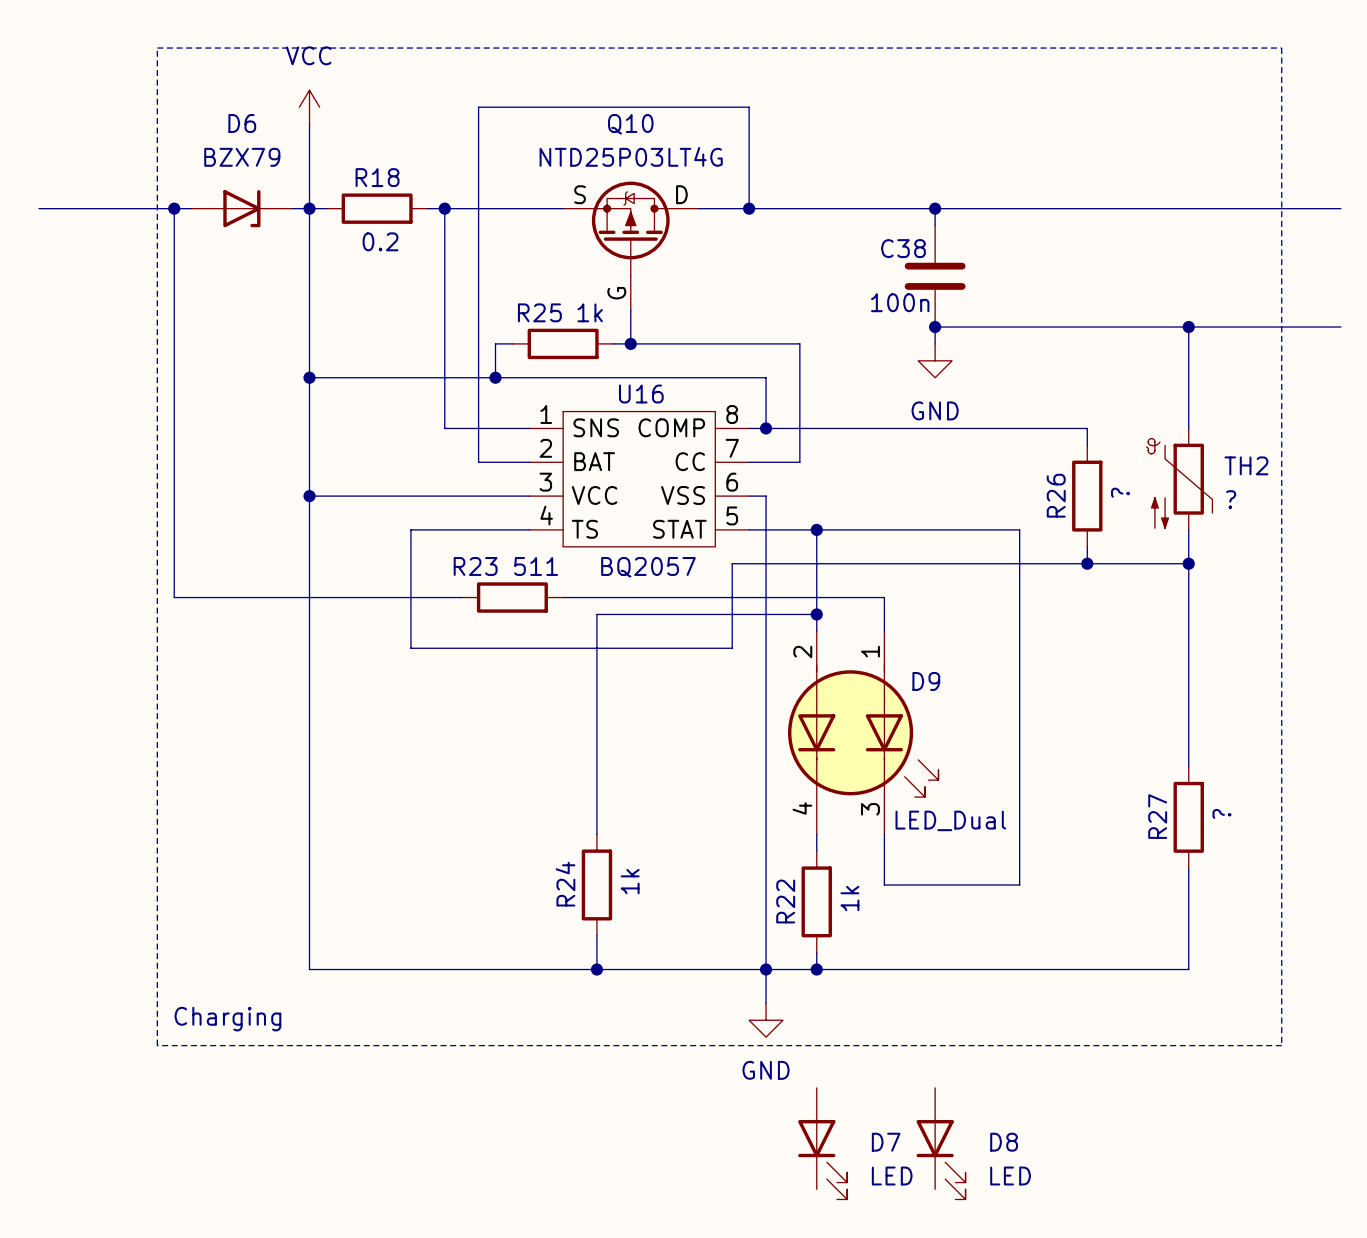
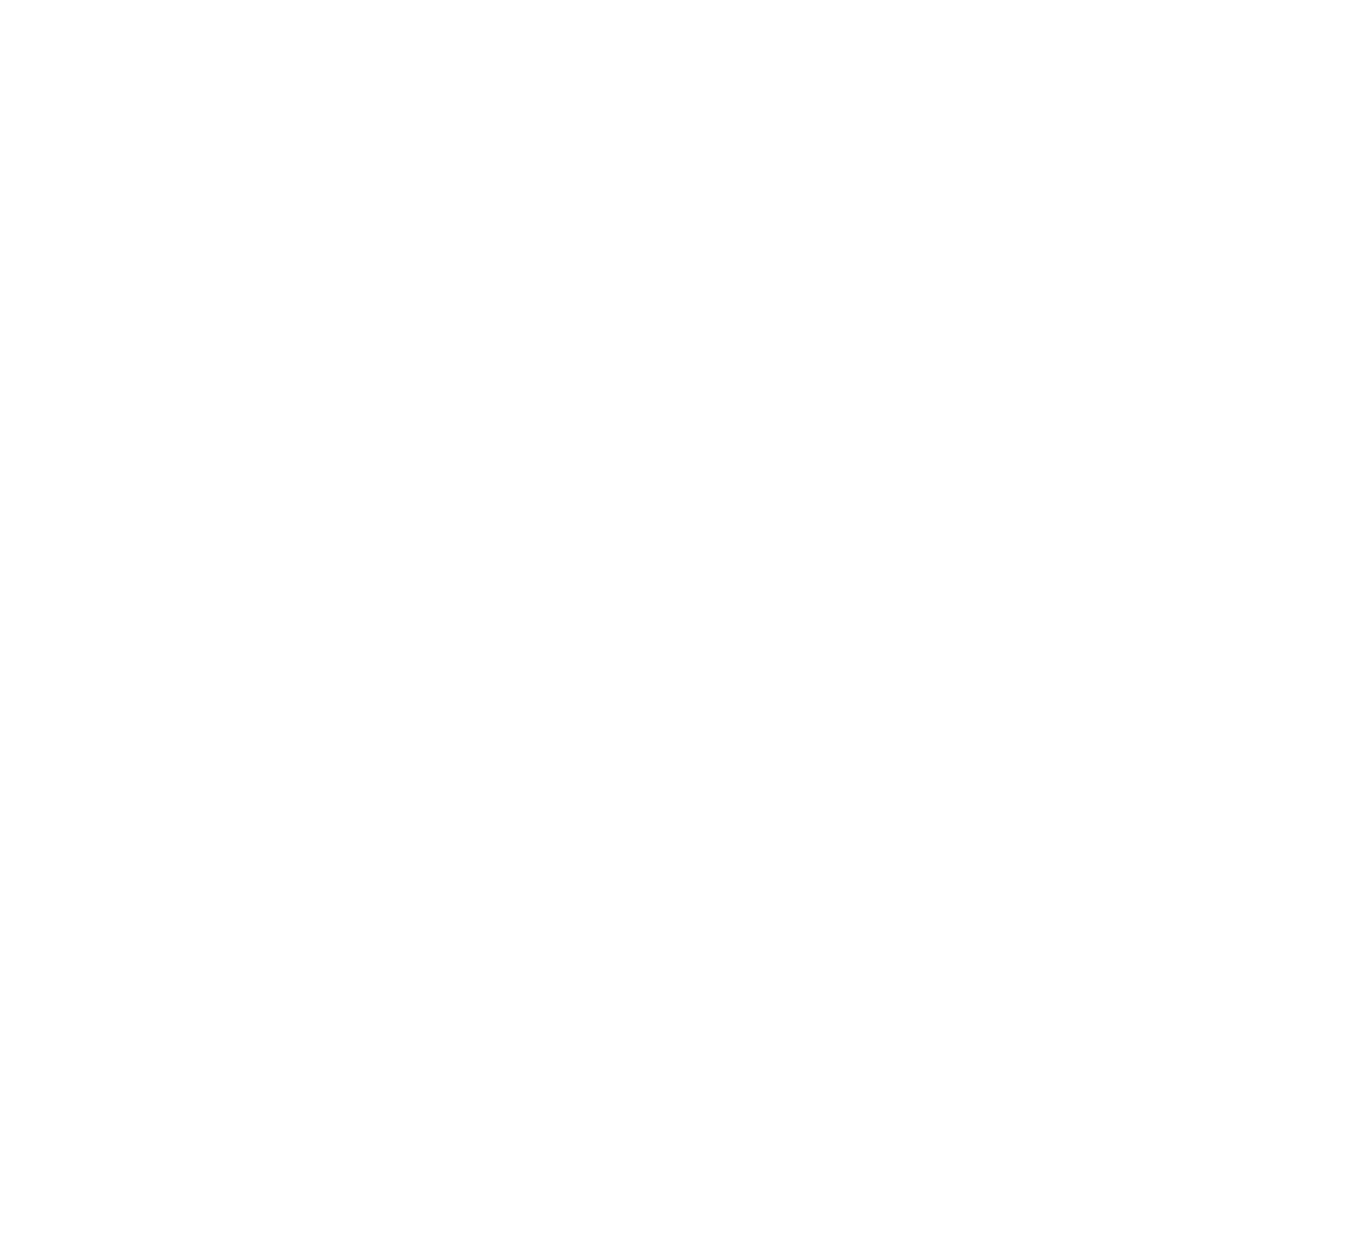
line: (157, 48) (1281, 48) (1281, 1045) (157, 1045) (157, 48) -> none
power symbol: VCC (309, 107) -> none
wire: (309, 124) (309, 969) (1188, 969) (1188, 868) -> none
wire: (38, 208) (191, 208) -> none
wire: (174, 208) (174, 597) (461, 597) -> none
junction: (174, 208) -> none
D6: BZX79 (241, 208) -> none
wire: (292, 208) (326, 208) -> none
junction: (309, 208) -> none
R18: 0.2 (377, 208) -> none
wire: (427, 208) (563, 208) -> none
wire: (444, 208) (444, 428) (529, 428) -> none
junction: (444, 208) -> none
wire: (698, 208) (1340, 208) -> none
wire: (749, 208) (749, 107) (478, 107) (478, 462) (529, 462) -> none
junction: (749, 208) -> none
wire: (935, 208) (935, 225) -> none
junction: (935, 208) -> none
Q10: NTD25P03LT4G (630, 245) -> none
C38: 100n (935, 276) -> none
wire: (630, 310) (630, 343) -> none
junction: (935, 327) -> none
wire: (1188, 327) (1188, 428) -> none
junction: (1188, 327) -> none
wire: (1340, 327) (935, 327) (935, 343) -> none
wire: (512, 343) (495, 343) (495, 377) -> none
R25: 1k (563, 343) -> none
wire: (613, 343) (799, 343) (799, 462) (749, 462) -> none
junction: (630, 343) -> none
power symbol: GND (935, 360) -> none
wire: (309, 377) (766, 377) (766, 428) -> none
junction: (309, 377) -> none
junction: (495, 377) -> none
wire: (749, 428) (1087, 428) (1087, 445) -> none
junction: (766, 428) -> none
U16: BQ2057 (639, 479) -> none
TH2: ? (1179, 479) -> none
wire: (309, 496) (529, 496) -> none
junction: (309, 496) -> none
wire: (749, 496) (766, 496) (766, 1003) -> none
R26: ? (1087, 496) -> none
wire: (529, 529) (410, 529) (410, 648) (732, 648) (732, 563) (1188, 563) -> none
wire: (749, 529) (1019, 529) (1019, 884) (884, 884) (884, 834) -> none
wire: (816, 529) (816, 631) -> none
junction: (816, 529) -> none
wire: (1188, 529) (1188, 766) -> none
wire: (1087, 546) (1087, 563) -> none
junction: (1087, 563) -> none
junction: (1188, 563) -> none
R23: 511 (512, 597) -> none
wire: (563, 597) (884, 597) (884, 631) -> none
wire: (816, 614) (596, 614) (596, 834) -> none
junction: (816, 614) -> none
D9: LED_Dual (863, 732) -> none
R27: ? (1188, 817) -> none
wire: (816, 834) (816, 851) -> none
R24: 1k (596, 884) -> none
R22: 1k (816, 901) -> none
wire: (596, 935) (596, 969) -> none
wire: (816, 952) (816, 969) -> none
junction: (596, 969) -> none
junction: (766, 969) -> none
junction: (816, 969) -> none
text: Charging (227, 1019) -> none
power symbol: GND (766, 1020) -> none
D7: LED (822, 1143) -> none
D8: LED (941, 1143) -> none

